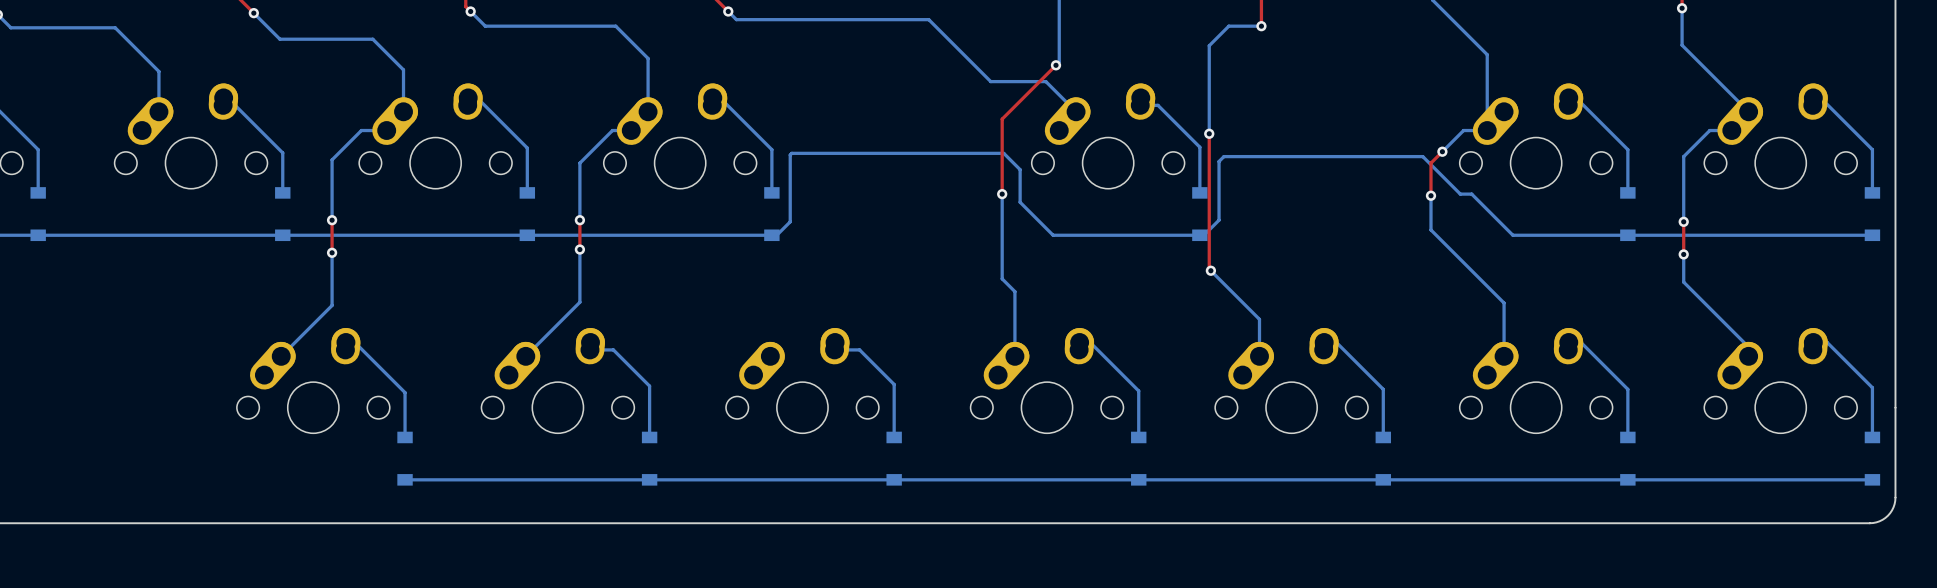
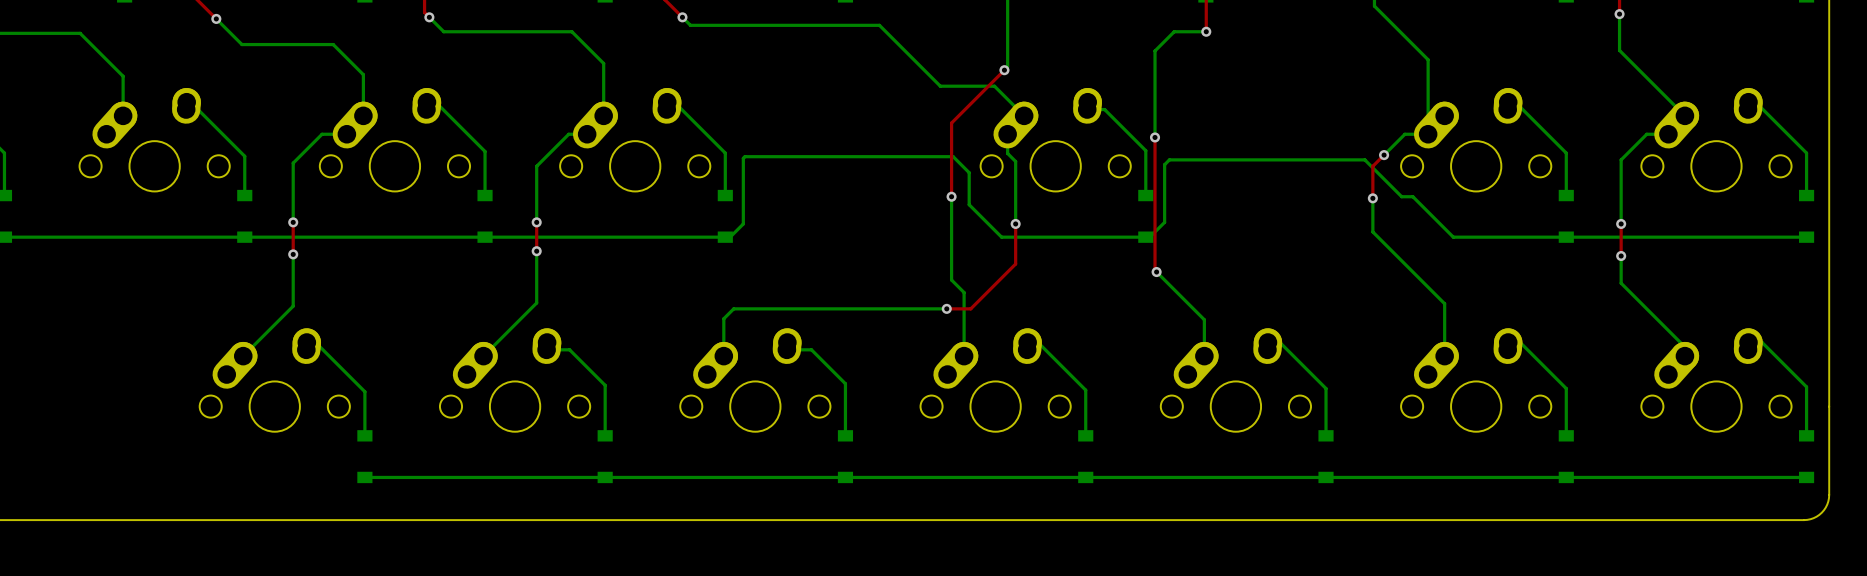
bottom track: none -> (1007, 134) (1007, 153) (1015, 161) (1015, 223)
top track: none -> (1015, 223) (1015, 264) (970, 308) (946, 308)
via: none -> (1015, 223)
bottom track: none -> (946, 308) (733, 308) (723, 318) (723, 356)
via: none -> (946, 308)

